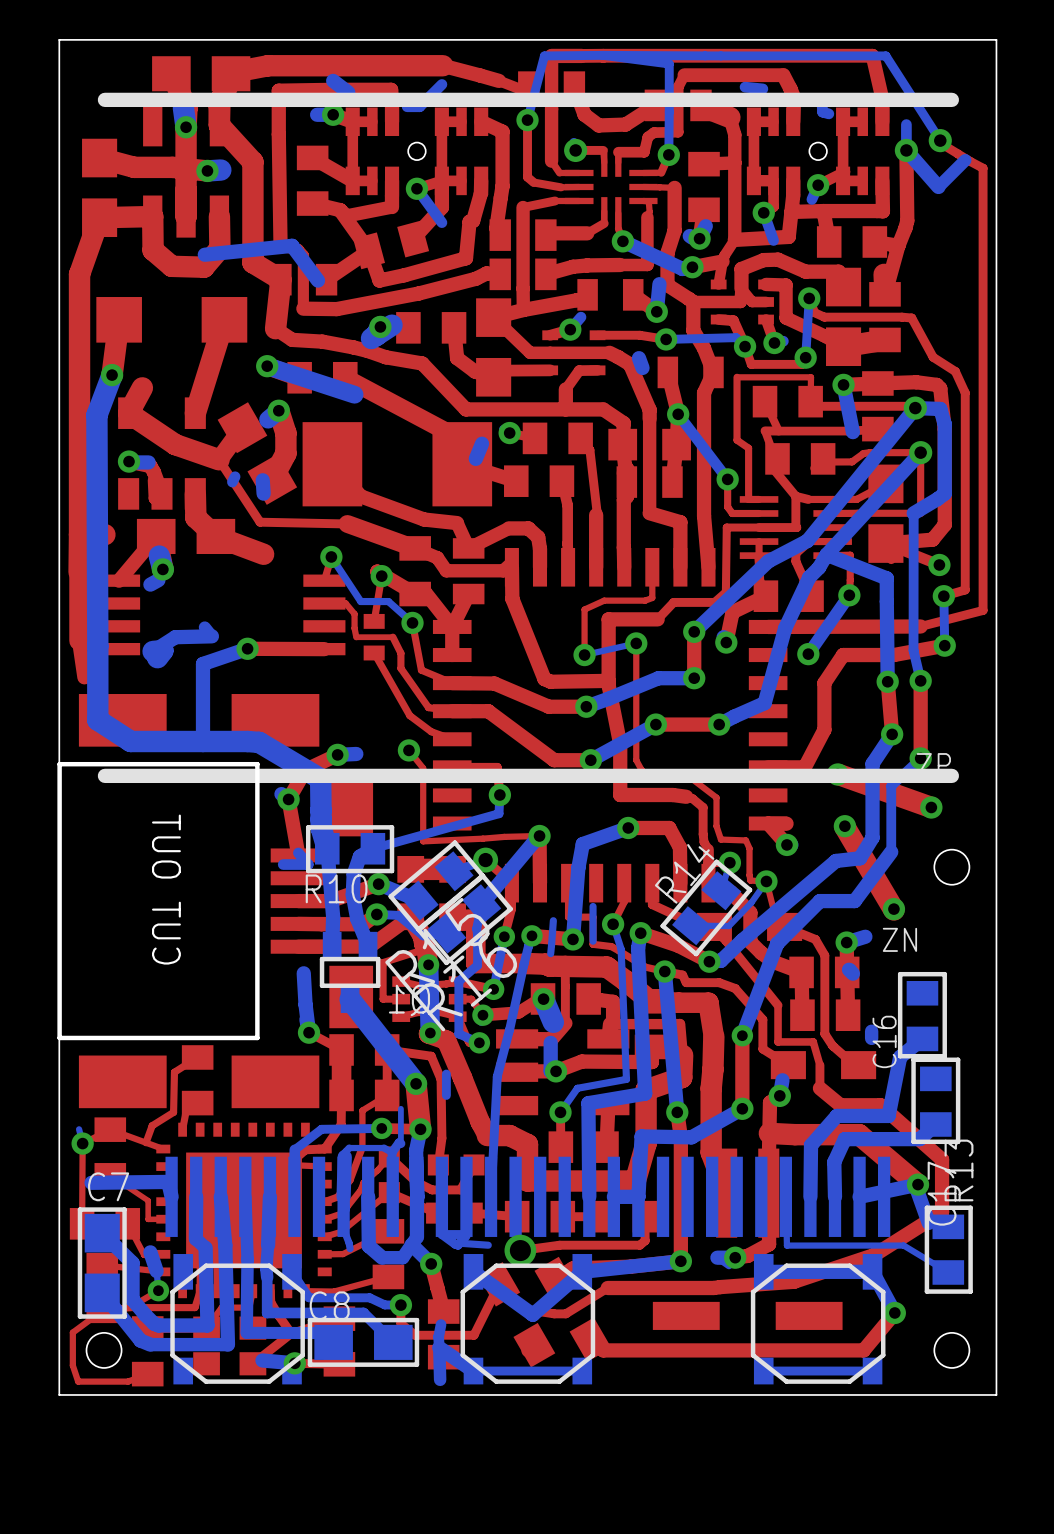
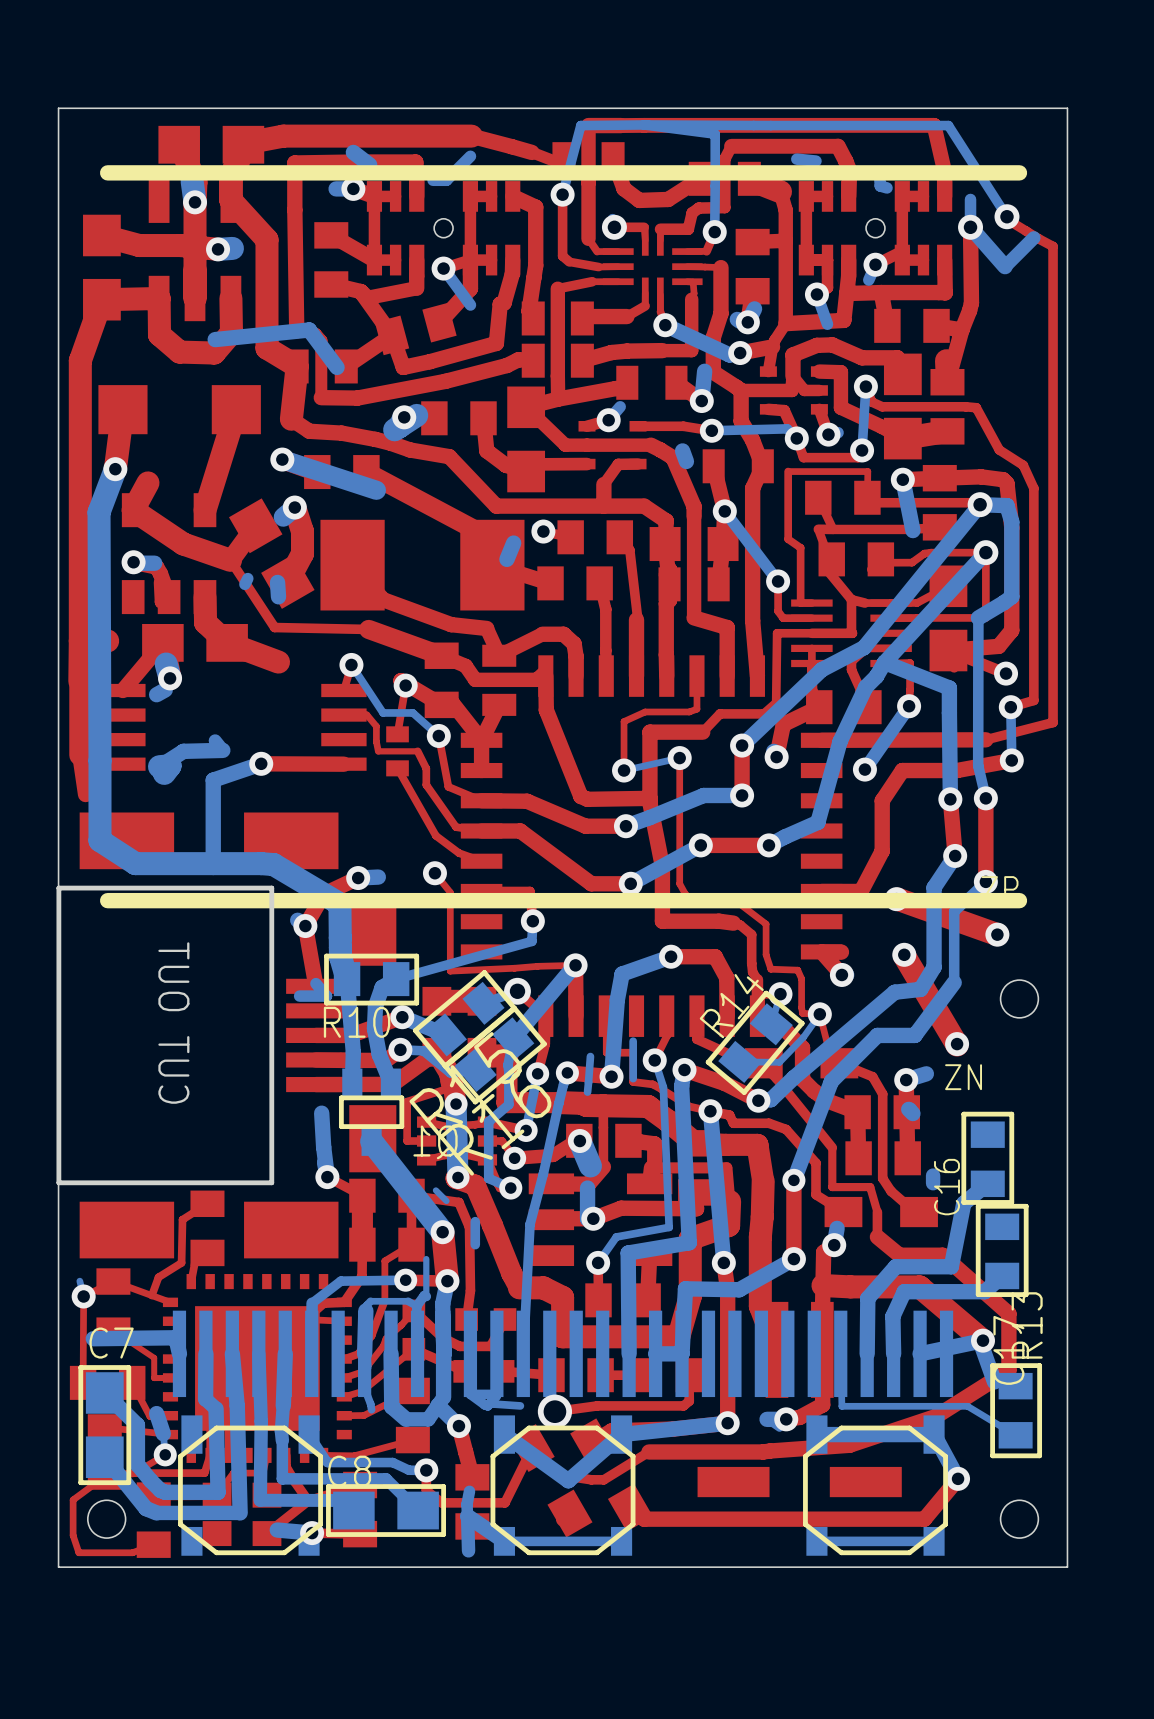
bottom track: none -> (435, 1190) (446, 1201)

